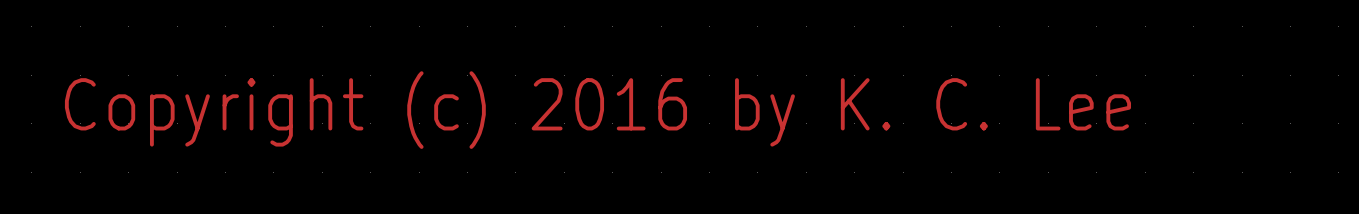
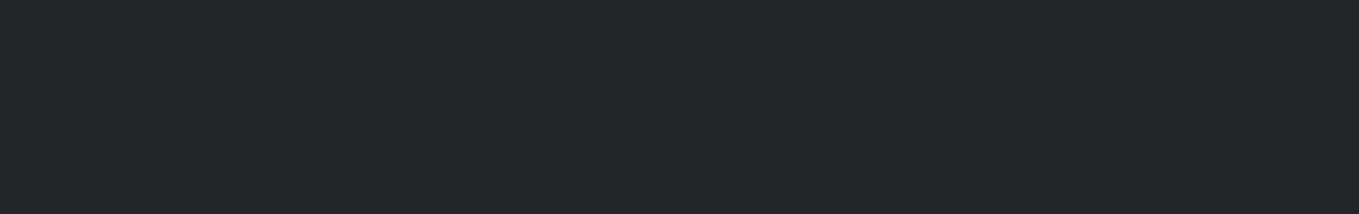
text: Copyright (c) 2016 by K. C. Lee (597, 110) -> none

